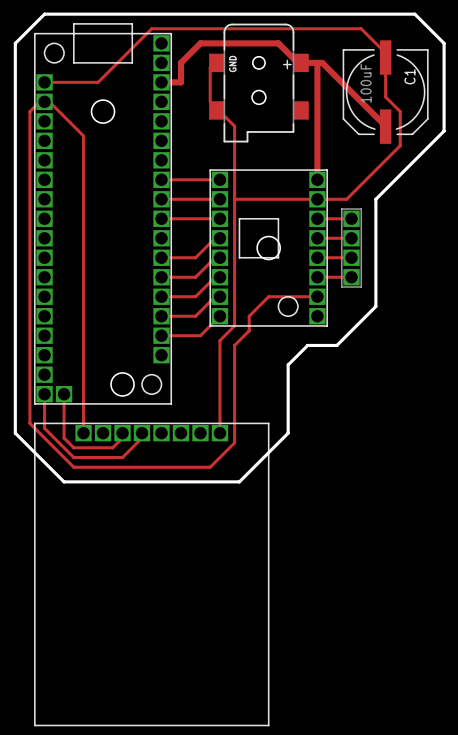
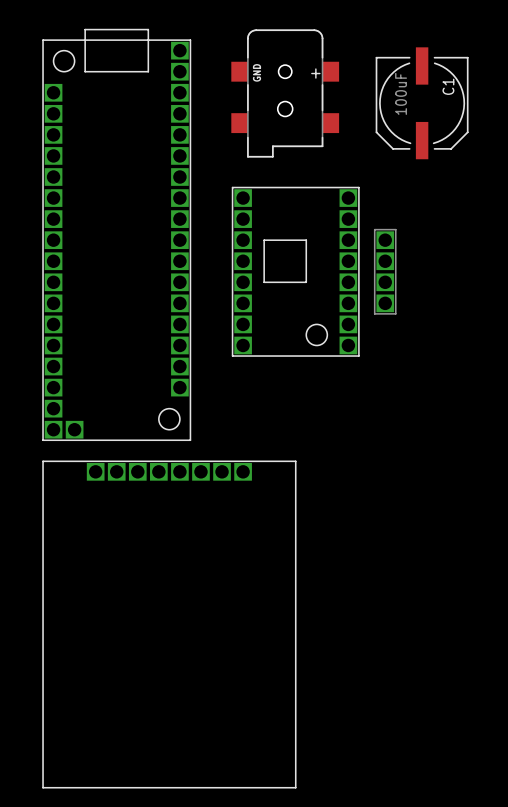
board edge: (44, 14) (15, 43) (15, 433) (64, 481) (239, 481) (288, 433) (288, 364) (307, 345) (336, 345) (375, 306) (375, 199) (444, 131) (444, 43) (414, 14) (44, 14) -> none
track: (216, 62) (210, 67) (210, 101) (234, 126) (234, 325) (219, 340) (219, 433) -> none
track: (317, 62) (317, 179) -> none
track: (44, 82) (98, 82) (151, 28) (361, 28) (385, 53) (385, 96) (400, 111) (400, 145) (346, 199) (234, 199) -> none
track: (161, 82) (180, 82) (180, 62) (200, 43) (278, 43) (297, 62) (322, 62) (385, 126) -> none
round board edge: [91, 99, 115, 124] -> none
track: (161, 179) (219, 179) -> none
track: (161, 199) (219, 199) -> none
track: (161, 218) (219, 218) -> none
track: (317, 218) (351, 218) -> none
round board edge: [257, 236, 281, 260] -> none
track: (219, 238) (215, 238) (195, 257) (161, 257) -> none
track: (317, 238) (351, 238) -> none
track: (219, 257) (215, 257) (195, 277) (161, 277) -> none
track: (317, 257) (351, 257) -> none
track: (219, 277) (215, 277) (195, 296) (161, 296) -> none
track: (317, 277) (351, 277) -> none
track: (219, 296) (215, 296) (195, 316) (161, 316) -> none
track: (317, 296) (268, 296) (249, 316) (249, 330) (234, 345) (234, 442) (210, 467) (73, 467) (29, 423) (29, 111) (39, 101) (49, 101) (83, 135) (83, 433) -> none
track: (219, 316) (200, 335) (161, 335) -> none
round board edge: [110, 372, 135, 397] -> none
track: (44, 394) (44, 428) (73, 457) (122, 457) (142, 438) (142, 433) -> none
track: (64, 394) (64, 438) (73, 447) (112, 447) (122, 438) (122, 433) -> none

